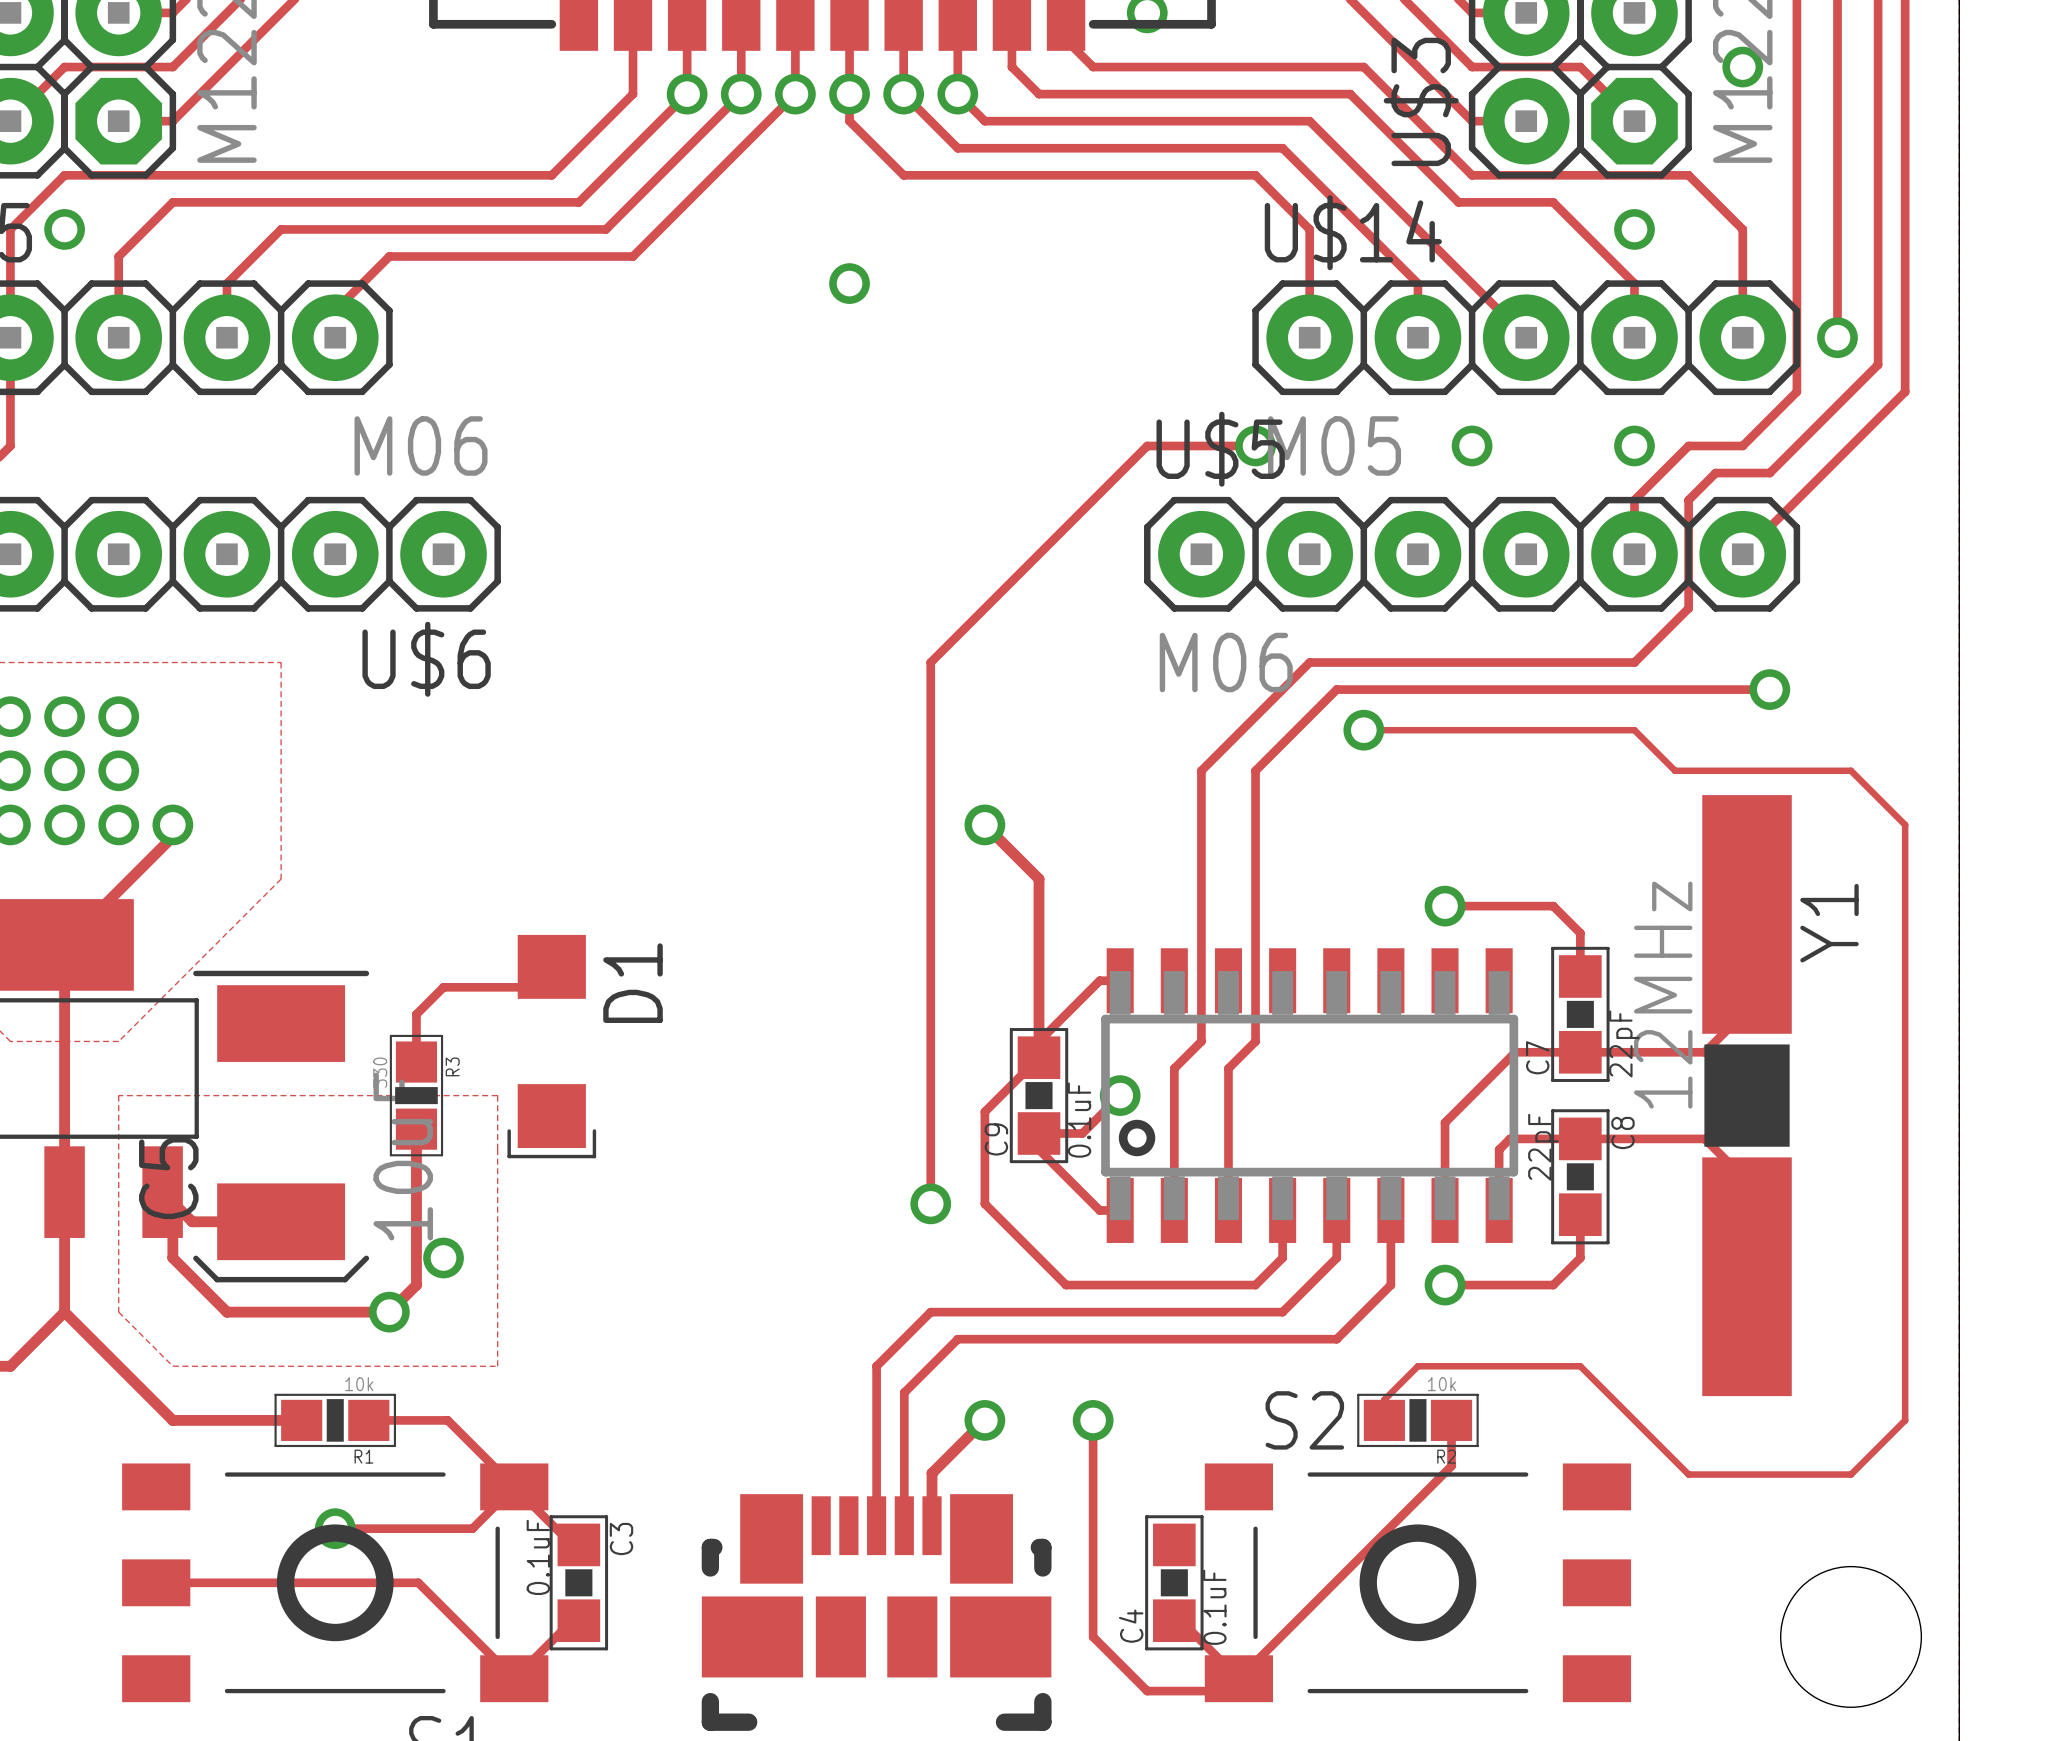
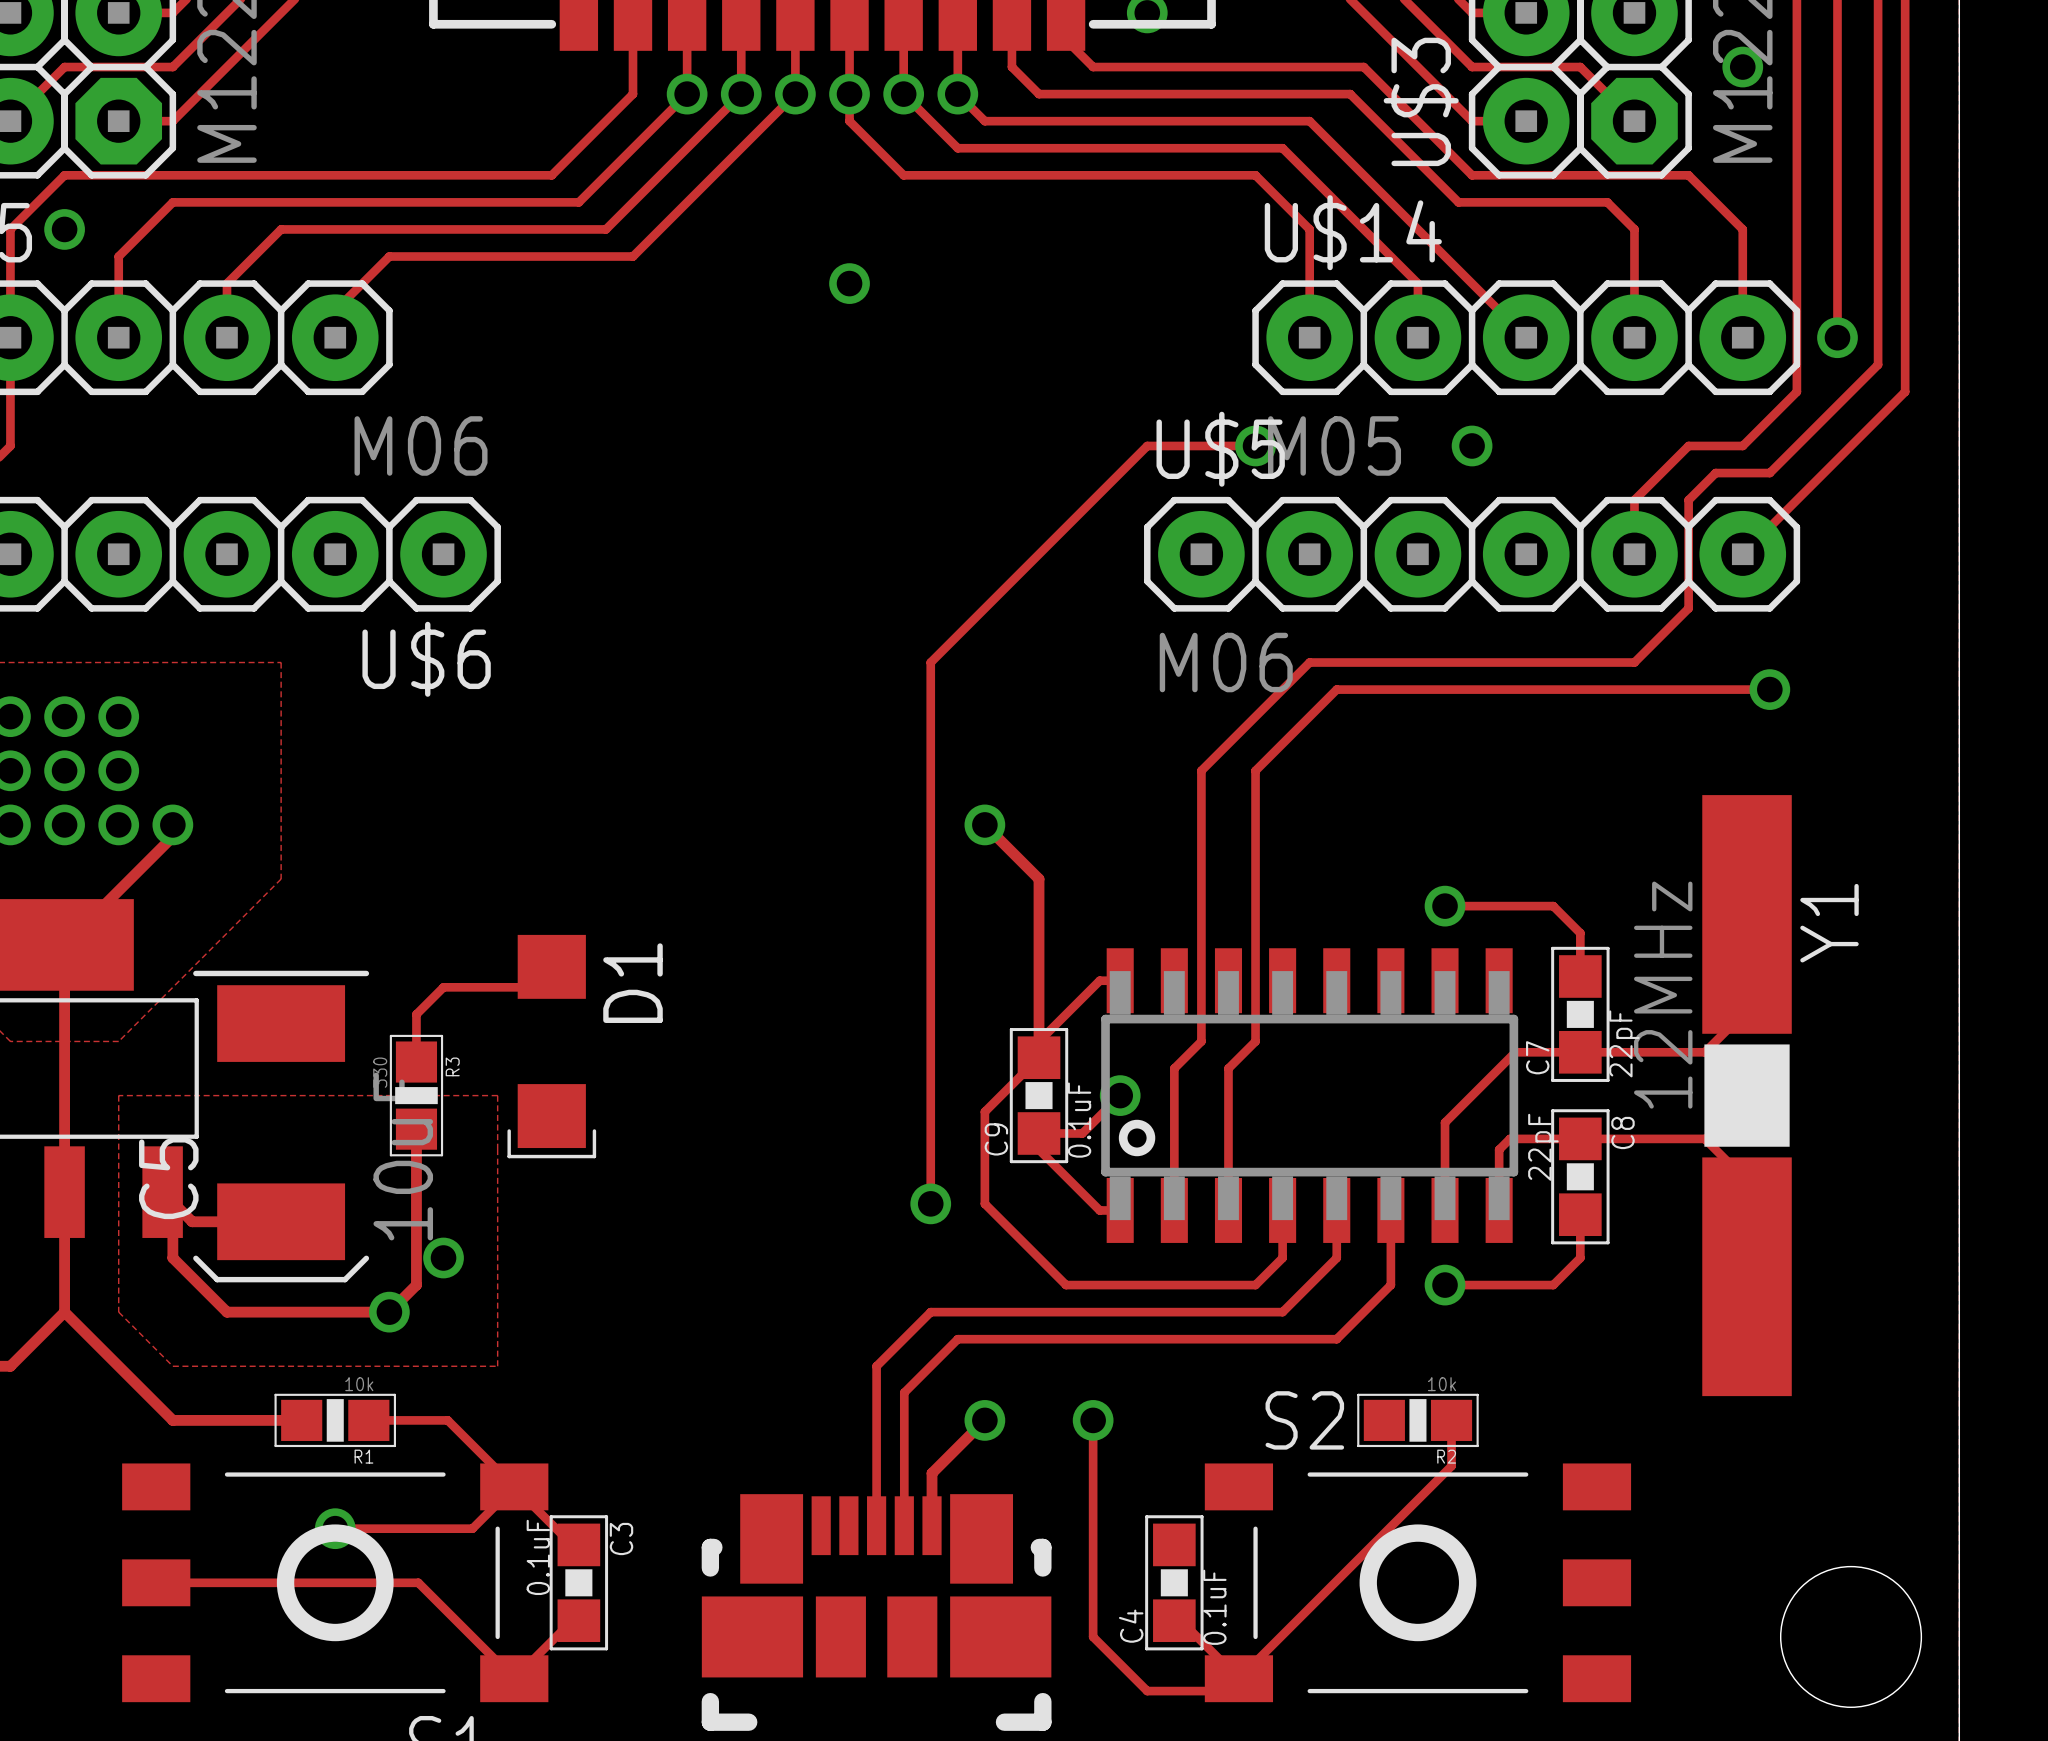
track: (1553, 202) (1634, 283) -> (1553, 202) (1607, 202) (1634, 229) (1634, 283)
via: (1634, 229) -> none
via: (1634, 445) -> none
track: (1363, 730) (1634, 730) (1675, 770) (1851, 770) (1905, 824) (1905, 1420) (1851, 1474) (1688, 1474) (1580, 1366) (1417, 1366) (1384, 1399) (1384, 1420) -> none
via: (1363, 730) -> none

